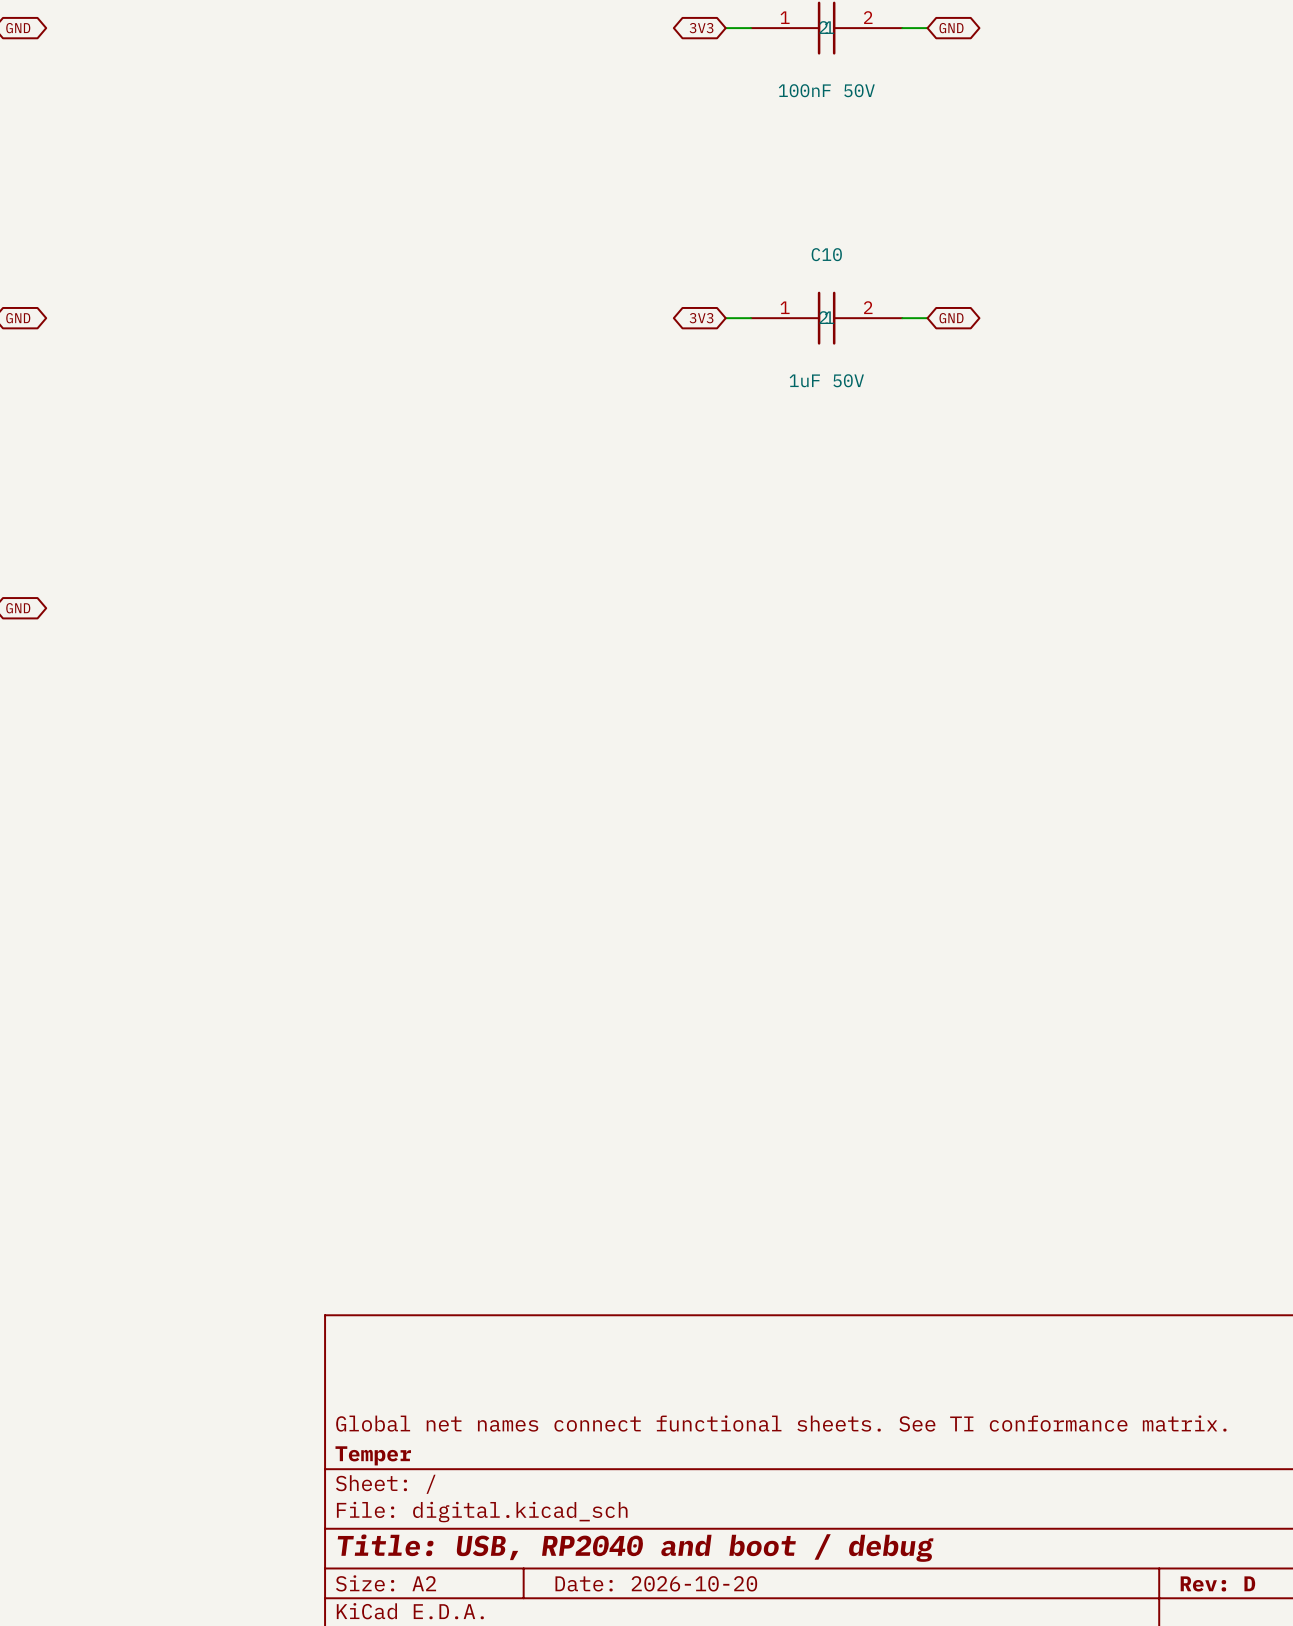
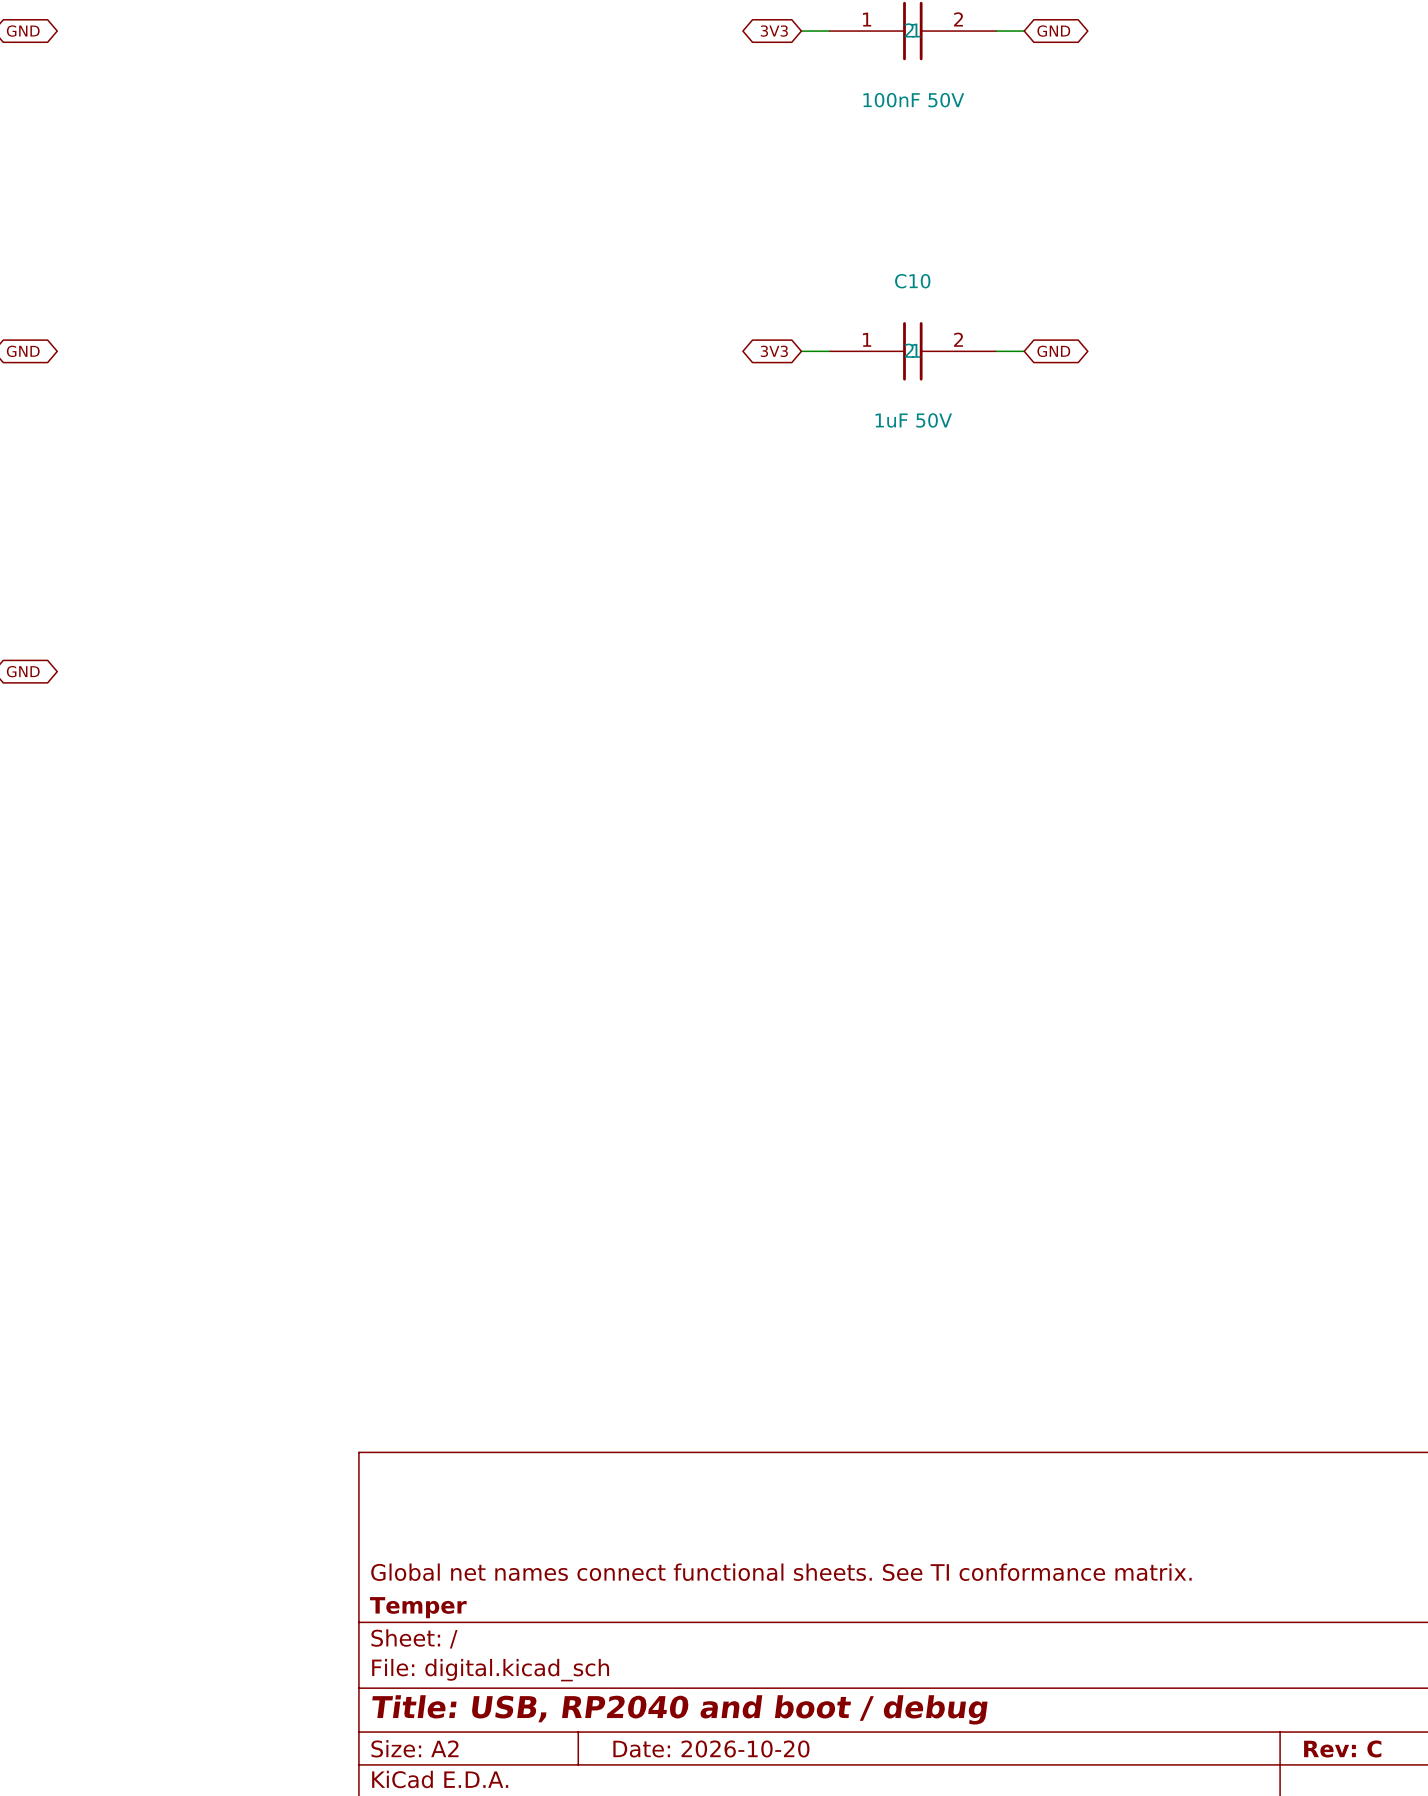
title block: Rev: D (1217, 1583) -> Rev: C (1342, 1748)

